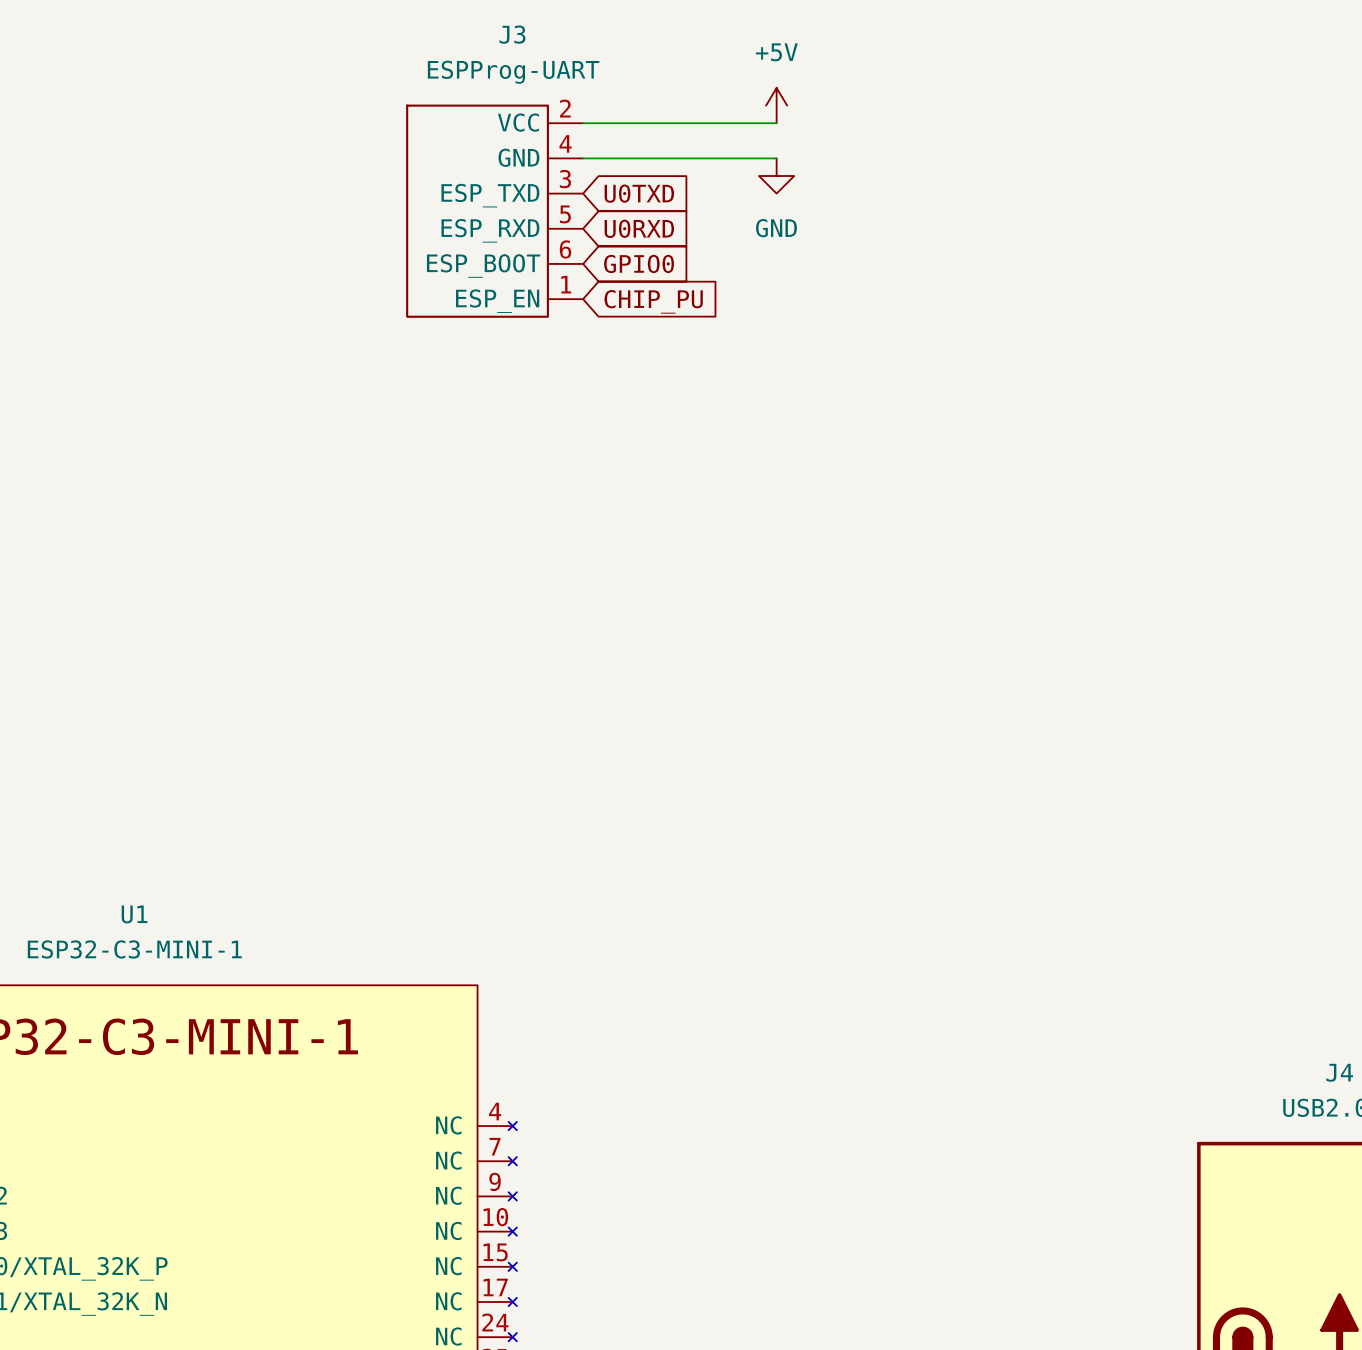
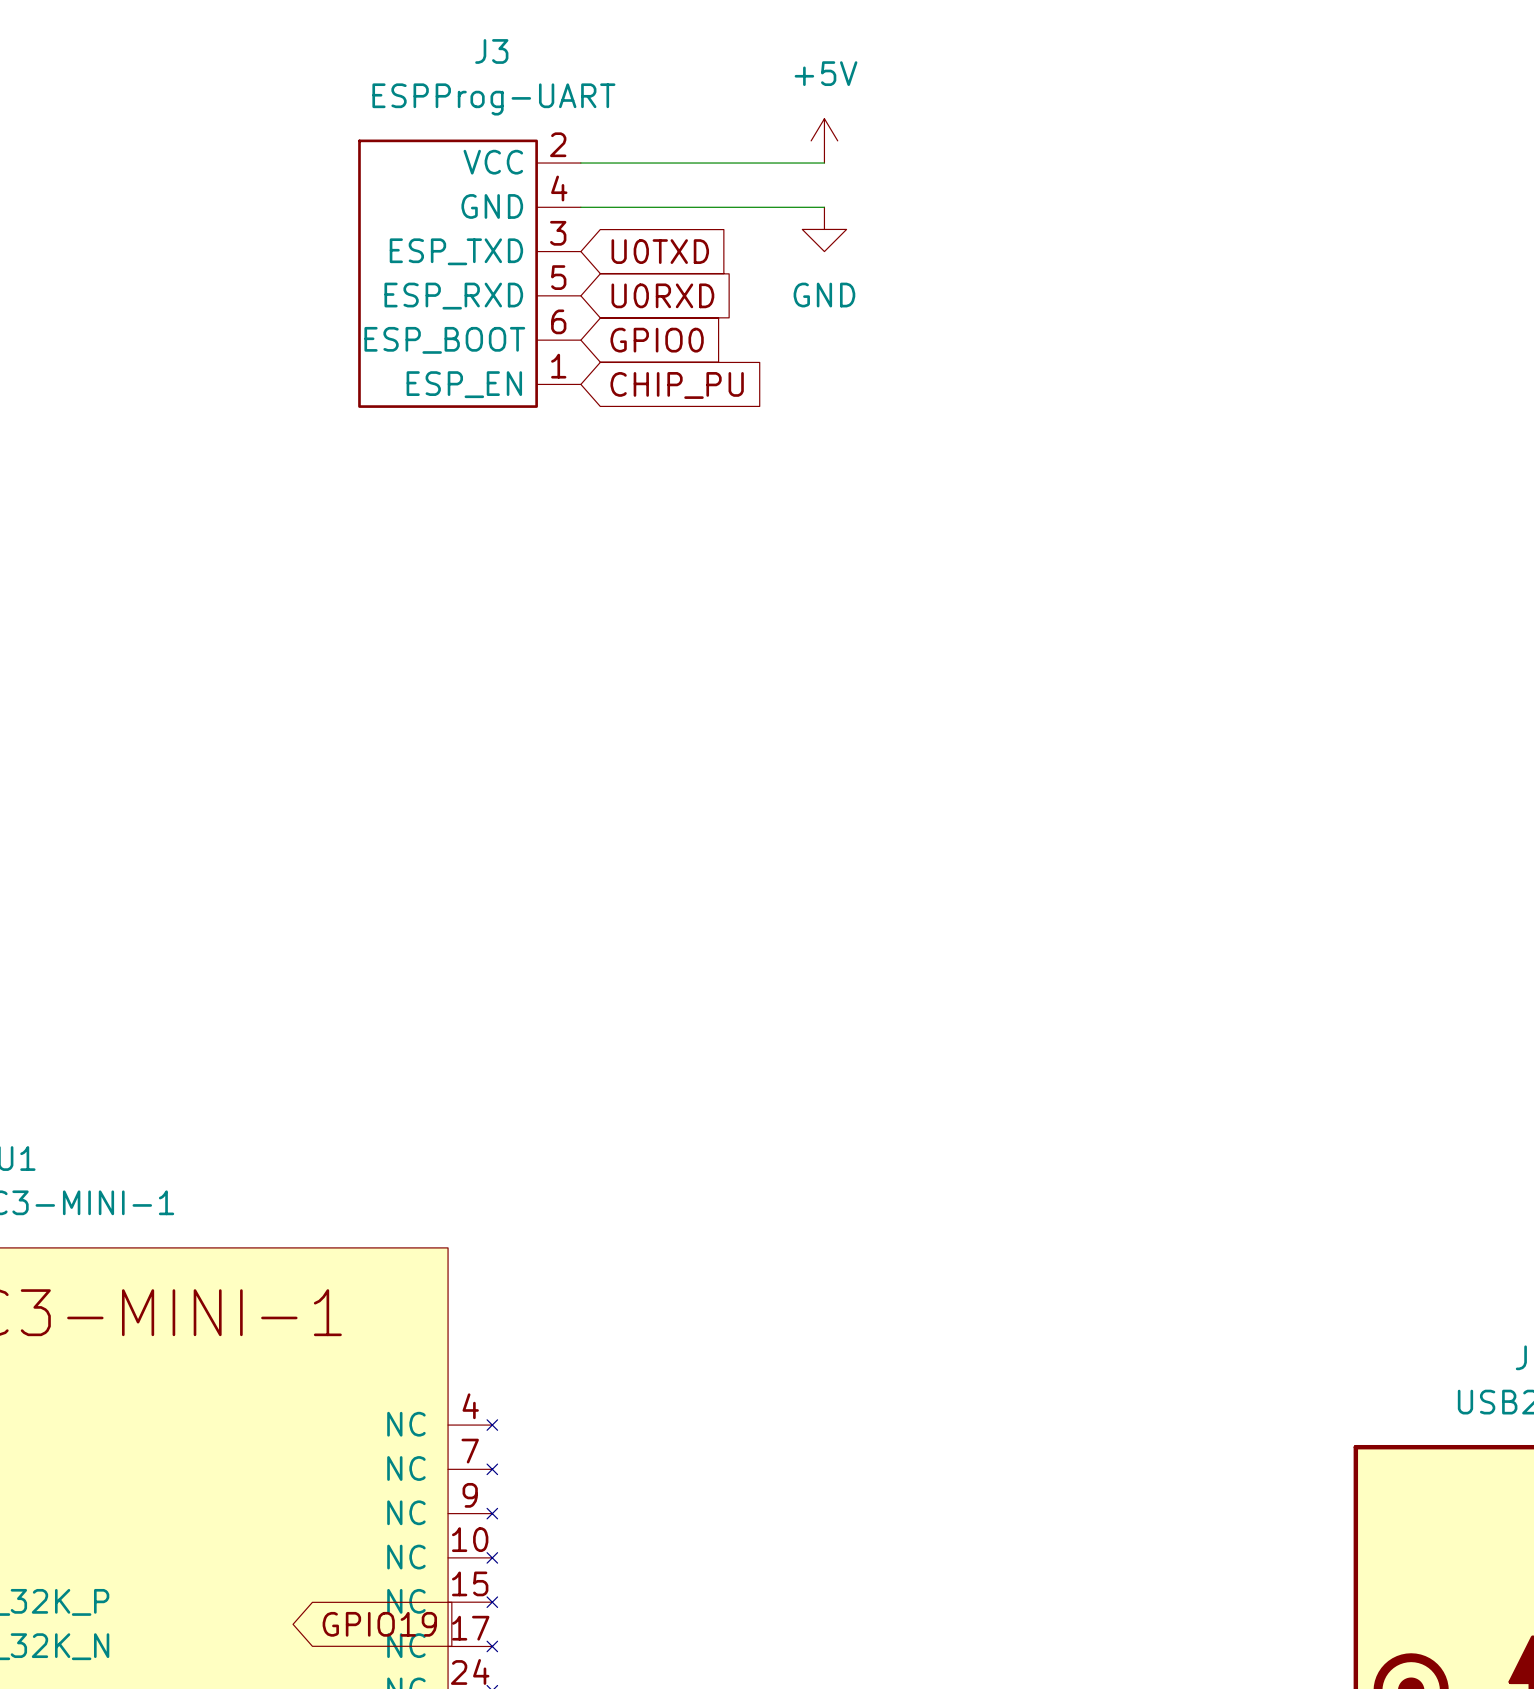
global label: none -> GPIO19 (379, 1624)

